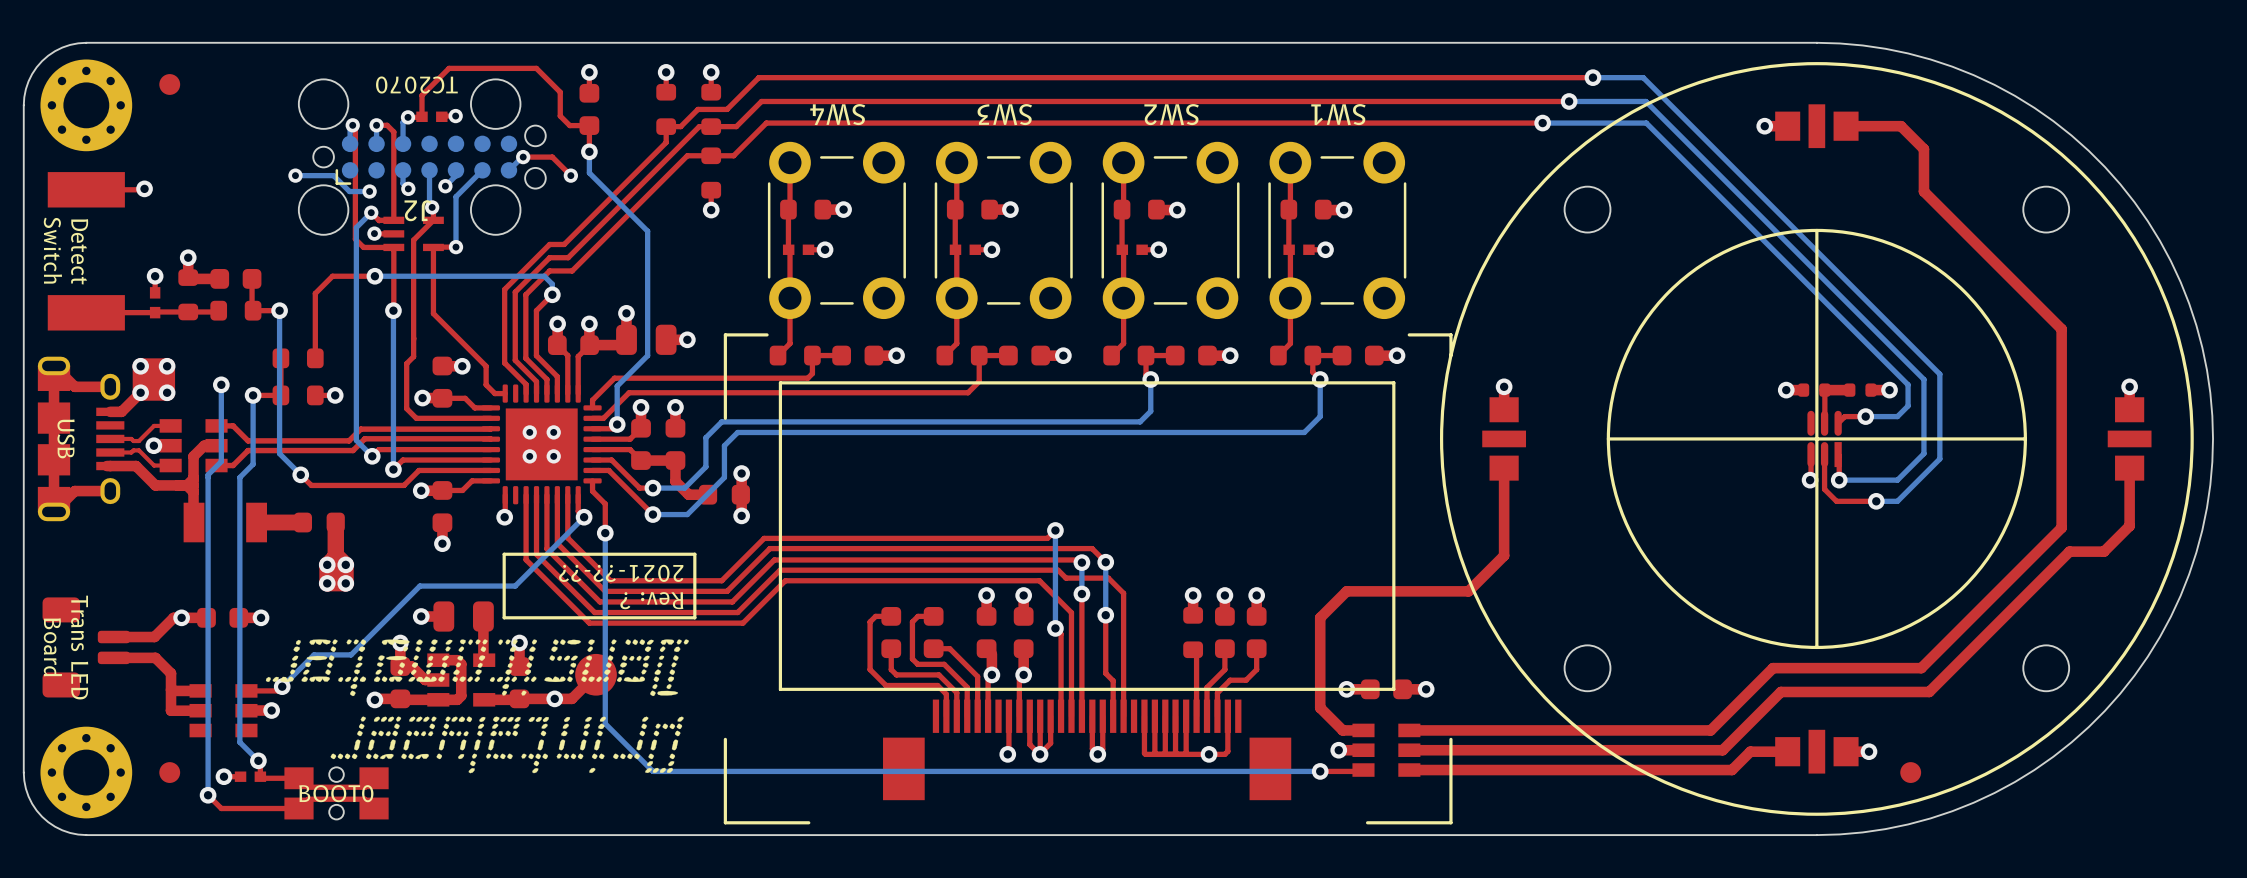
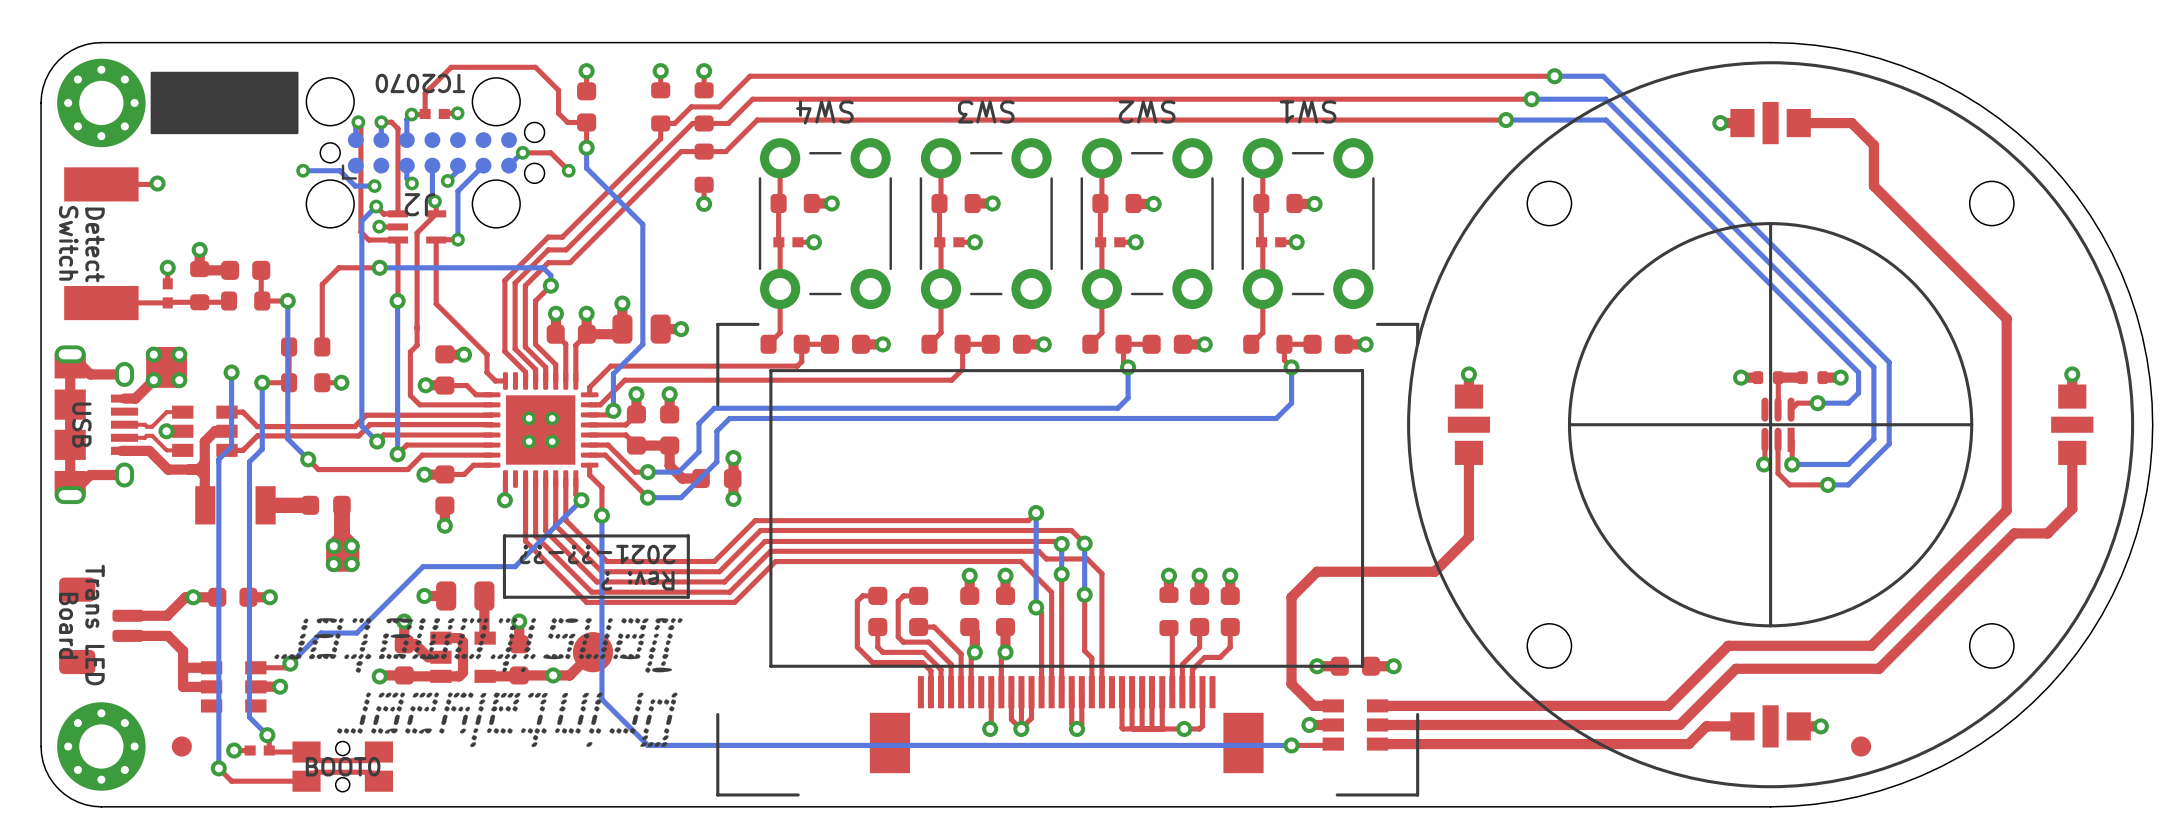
drawing: none -> [150, 71, 299, 135]

